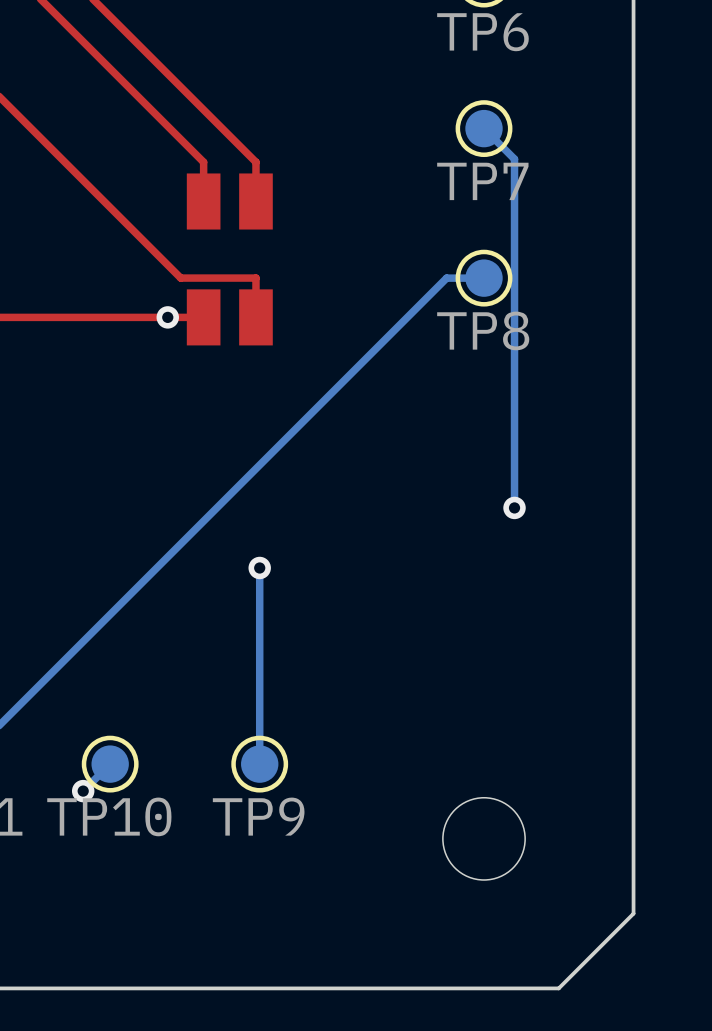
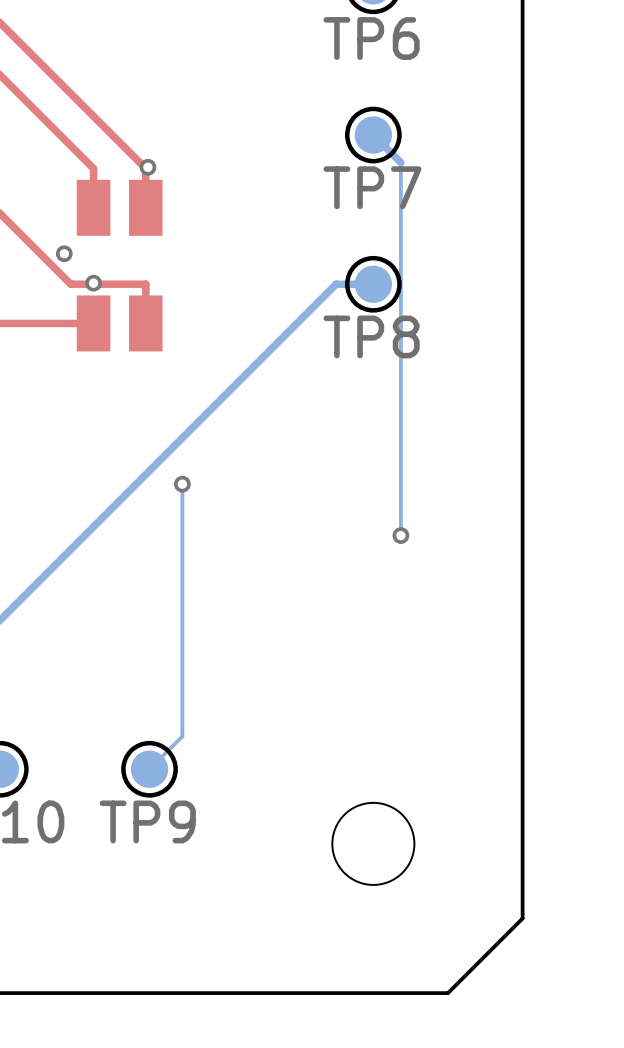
bottom track: (511, 156) (514, 159) (514, 507) -> (400, 162) (400, 535)
via: none -> (147, 167)
via: none -> (64, 253)
via: none -> (93, 283)
via: (167, 317) -> none
via: none -> (182, 484)
via: (514, 507) -> none
via: none -> (400, 535)
bottom track: (259, 567) (259, 764) -> (182, 484) (182, 736) (149, 769)
via: (259, 567) -> none

